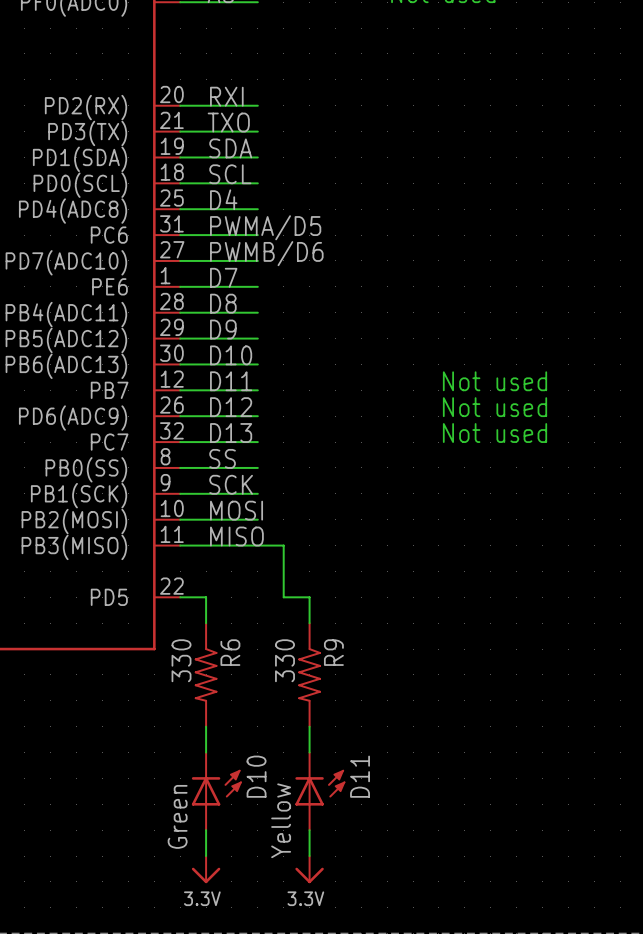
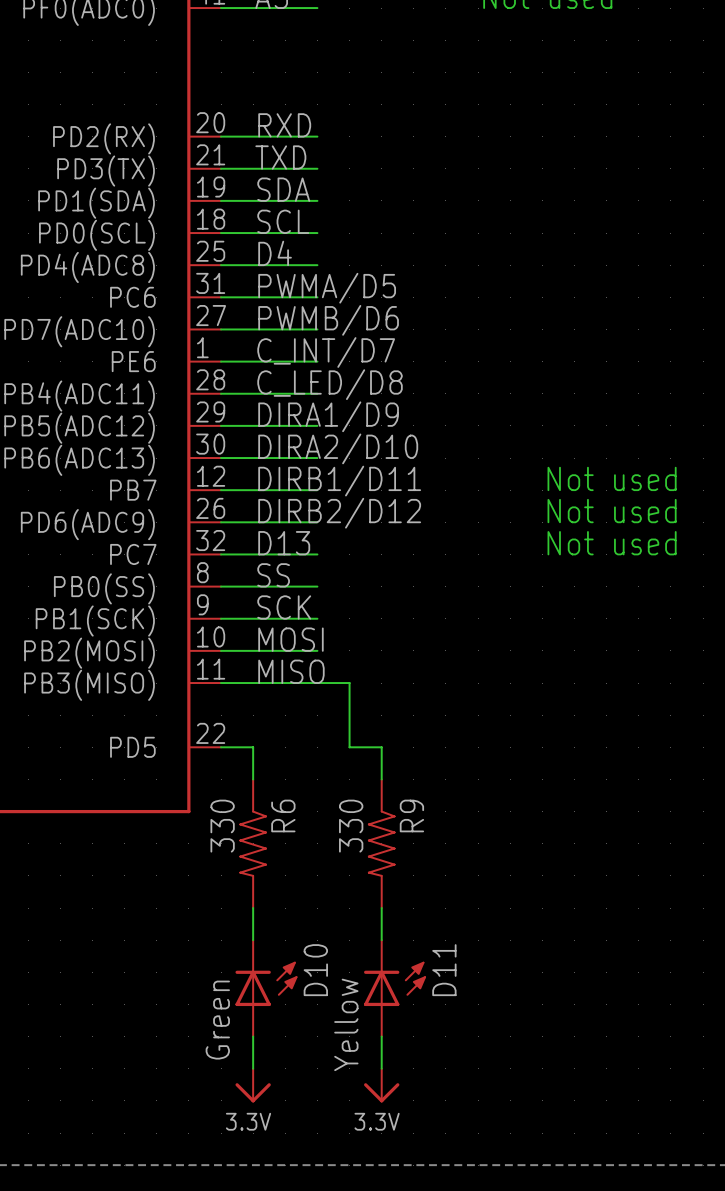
label: RXI (226, 96) -> RXD (284, 125)
label: TXO (228, 122) -> TXD (280, 157)
label: D7 (223, 277) -> C_INT/D7 (326, 352)
label: D8 (223, 303) -> C_LED/D8 (330, 384)
label: D9 (223, 329) -> DIRA1/D9 (328, 416)
label: D10 (231, 355) -> DIRA2/D10 (338, 448)
label: D11 (231, 381) -> DIRB1/D11 (339, 481)
label: D12 (231, 407) -> DIRB2/D12 (339, 513)

